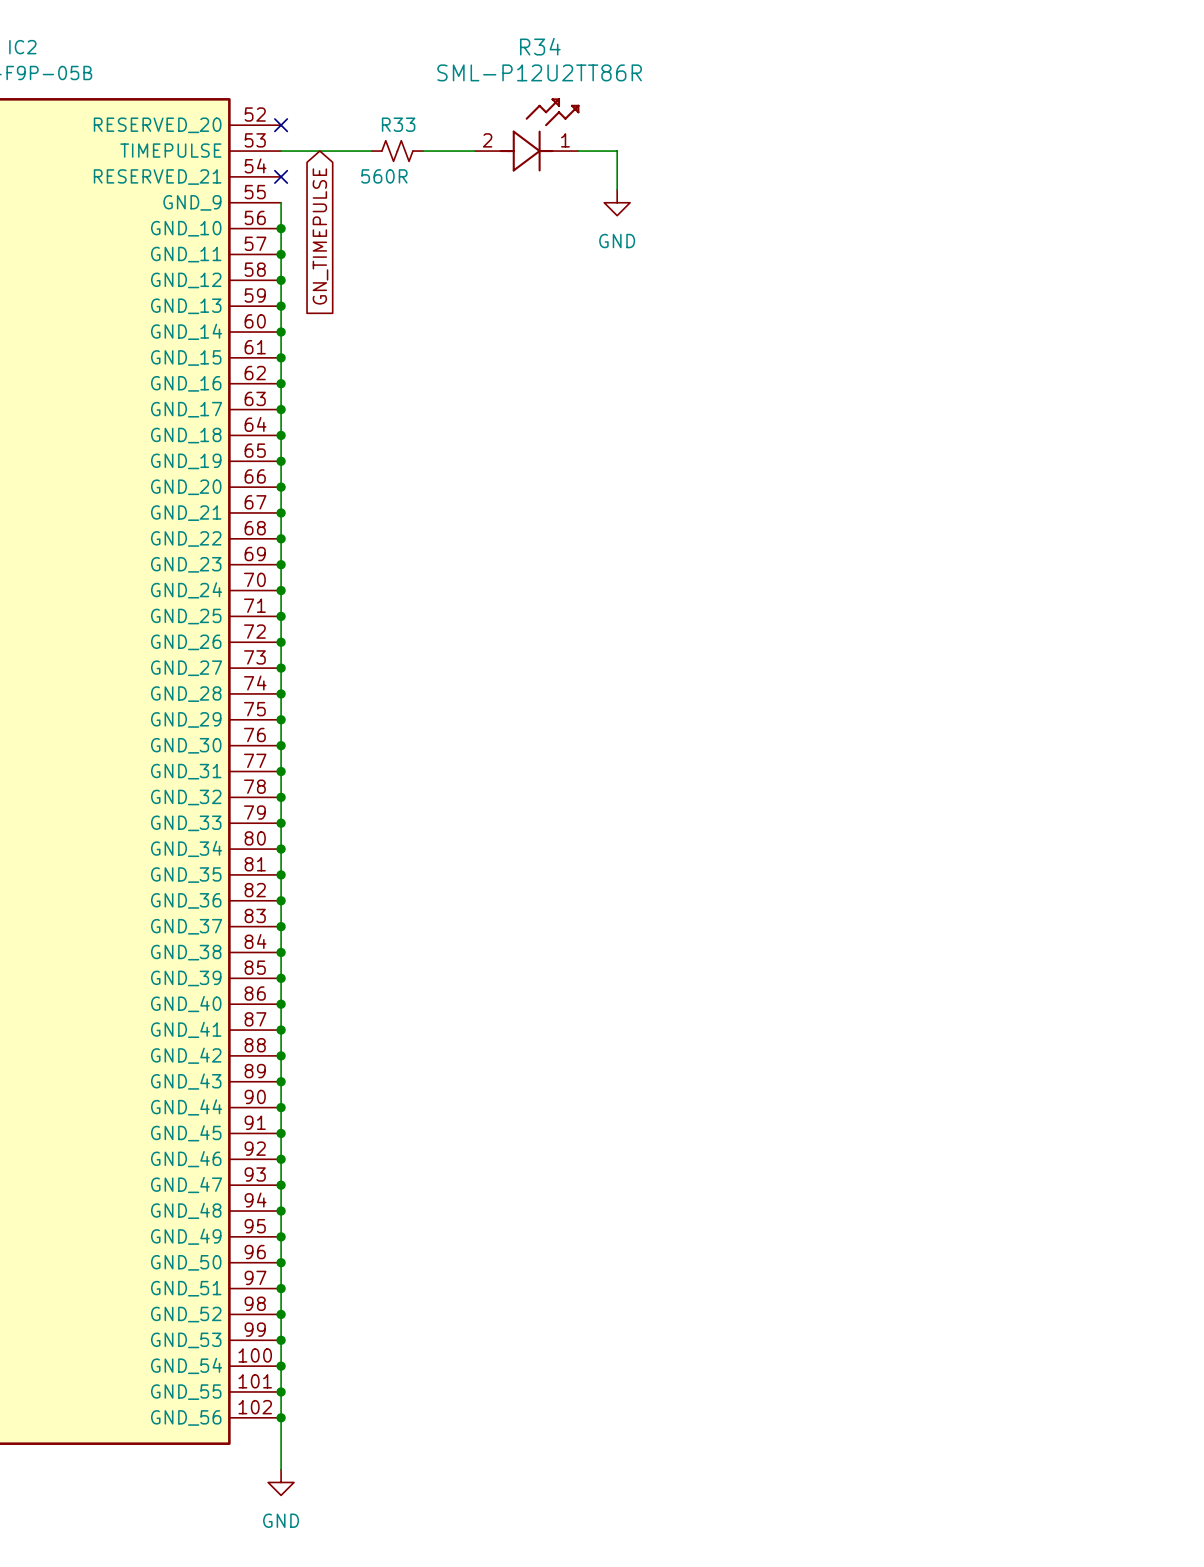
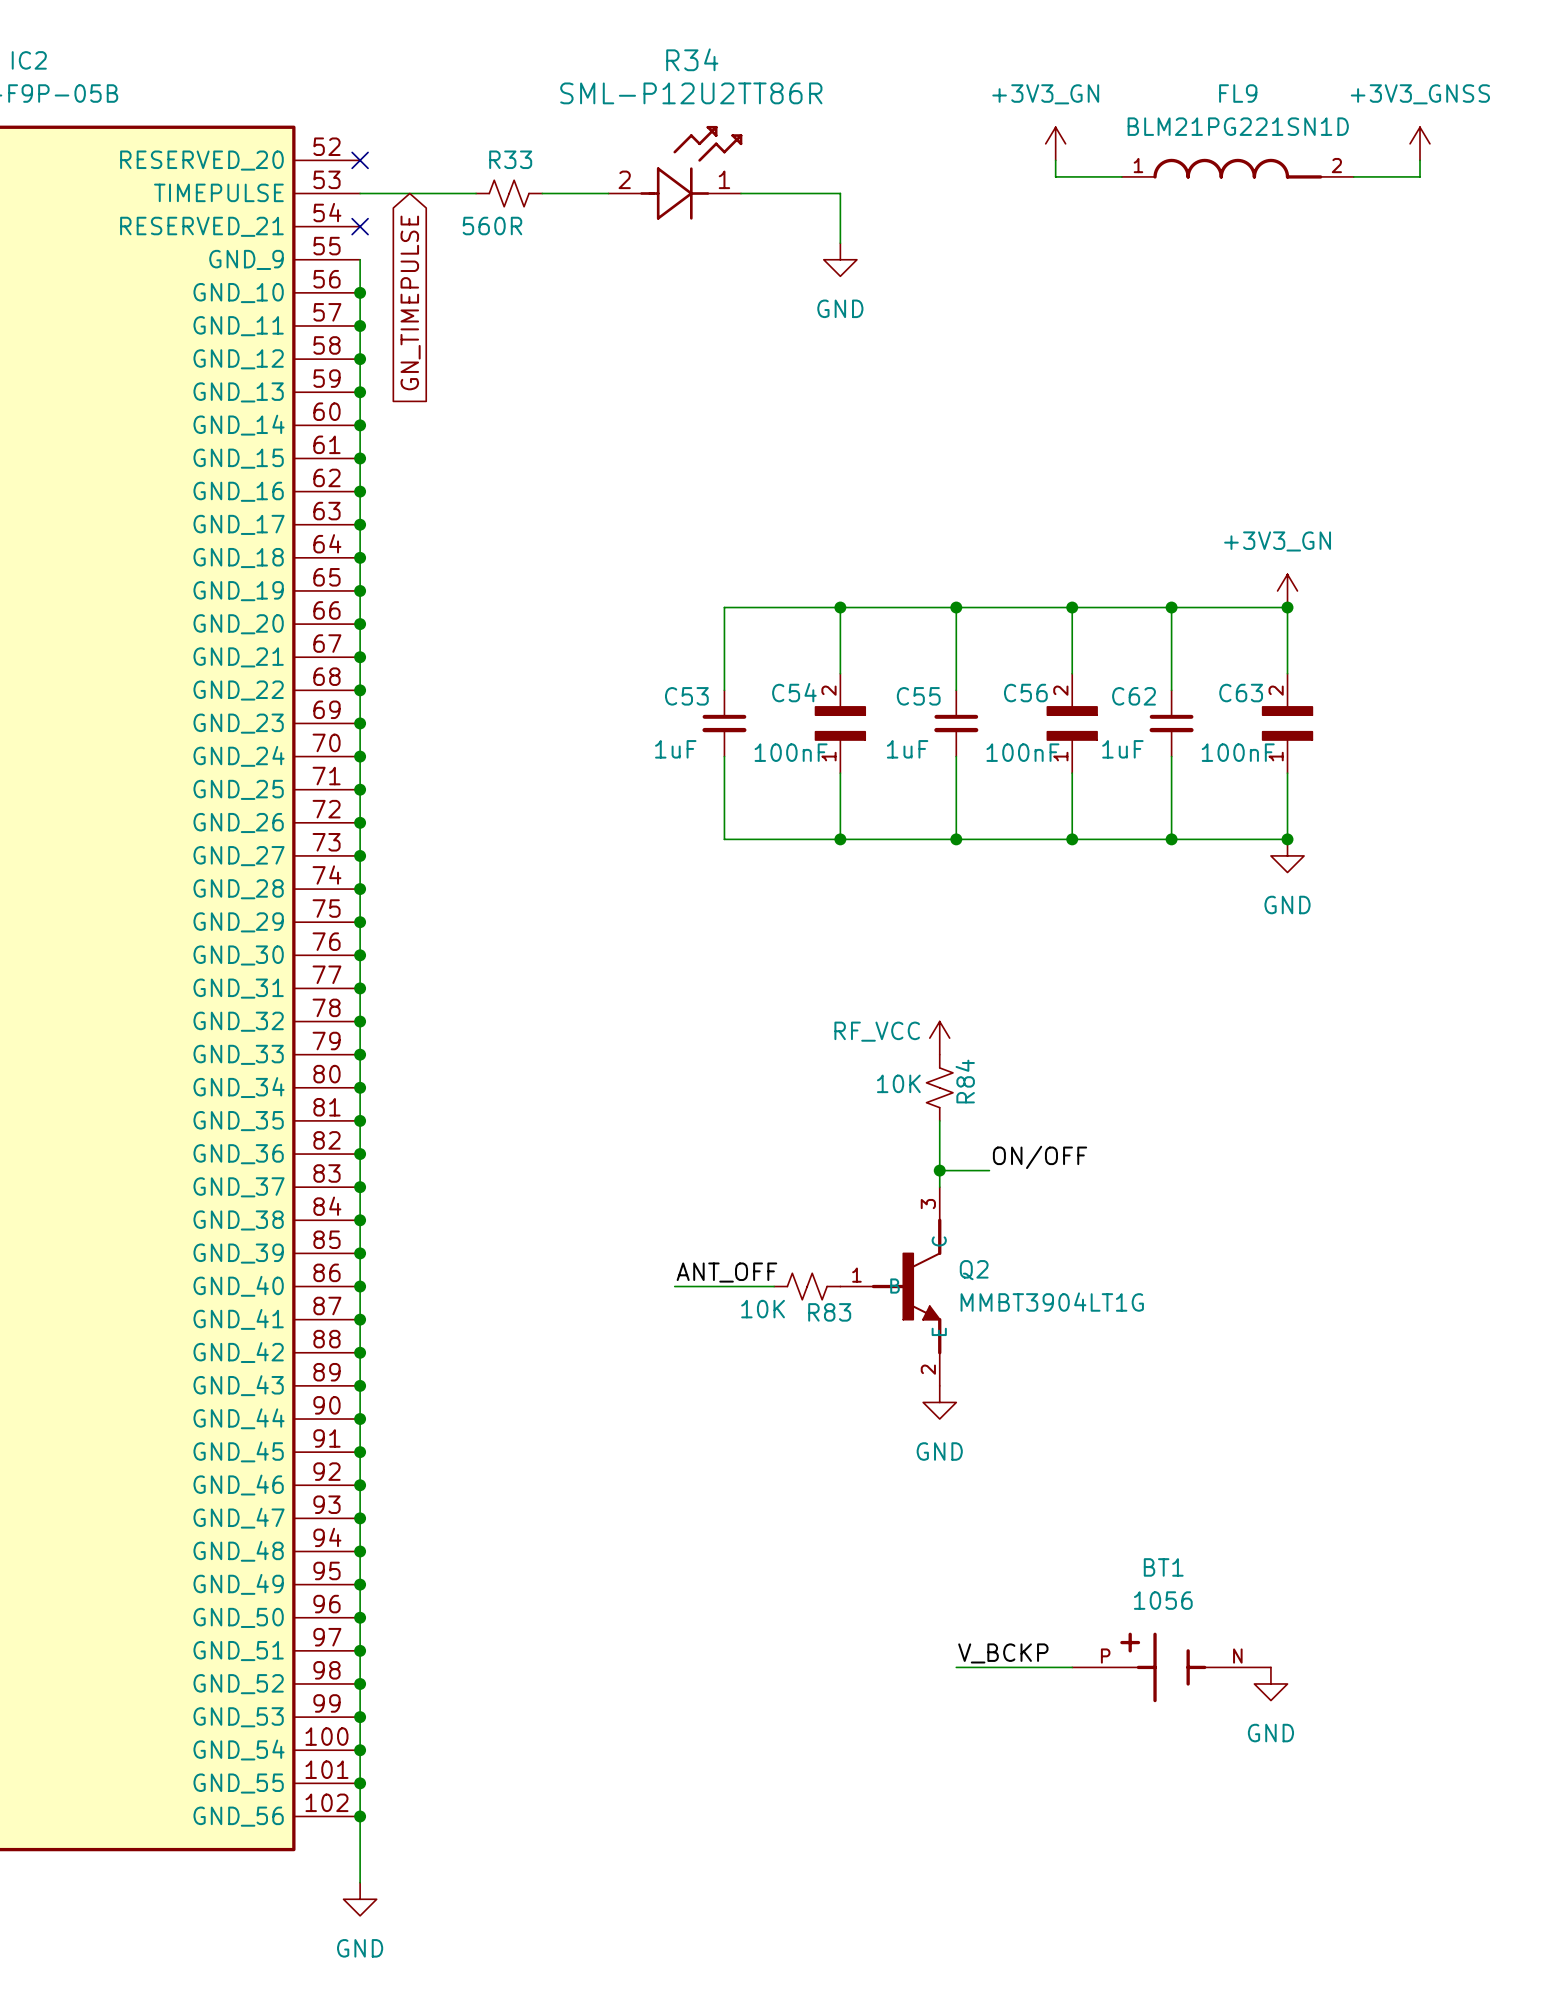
power symbol: none -> +3V3_GN (1055, 143)
power symbol: none -> +3V3_GNSS (1420, 143)
wire: none -> (1055, 160) (1055, 176) (1121, 176)
wire: none -> (1420, 160) (1420, 176) (1353, 176)
FL9: none -> BLM21PG221SN1D (1237, 168)
wire: (617, 151) (617, 189) -> (790, 193) (840, 193) (840, 243)
power symbol position: GND (617, 202) -> GND (840, 259)
power symbol: none -> +3V3_GN (1287, 590)
wire: none -> (840, 607) (840, 673)
junction: none -> (840, 607)
wire: none -> (956, 607) (956, 690)
junction: none -> (956, 607)
wire: none -> (1072, 607) (1072, 673)
junction: none -> (1072, 607)
wire: none -> (1171, 607) (1171, 690)
junction: none -> (1171, 607)
junction: none -> (1287, 607)
wire: none -> (1287, 673) (1287, 607) (724, 607) (724, 690)
C53: none -> 1uF (724, 723)
C54: none -> 100nF (840, 723)
C55: none -> 1uF (956, 723)
C56: none -> 100nF (1072, 723)
C62: none -> 1uF (1171, 723)
C63: none -> 100nF (1287, 723)
wire: none -> (724, 756) (724, 839) (1287, 839) (1287, 773)
wire: none -> (956, 756) (956, 839)
wire: none -> (1171, 756) (1171, 839)
wire: none -> (840, 773) (840, 839)
wire: none -> (1072, 773) (1072, 839)
junction: none -> (840, 839)
junction: none -> (956, 839)
junction: none -> (1072, 839)
junction: none -> (1171, 839)
junction: none -> (1287, 839)
power symbol: none -> GND (1287, 855)
power symbol: none -> RF_VCC (939, 1038)
R84: none -> 10K (939, 1087)
wire: none -> (939, 1120) (939, 1187)
label: none -> ON/OFF (1040, 1157)
wire: none -> (939, 1170) (989, 1170)
junction: none -> (939, 1170)
label: none -> ANT_OFF (726, 1272)
wire: none -> (674, 1286) (774, 1286)
R83: none -> 10K (807, 1286)
Q2: none -> MMBT3904LT1G (890, 1286)
power symbol: none -> GND (939, 1402)
label: none -> V_BCKP (1003, 1653)
wire: none -> (956, 1667) (1072, 1667)
BT1: none -> 1056 (1171, 1667)
power symbol: none -> GND (1270, 1683)

